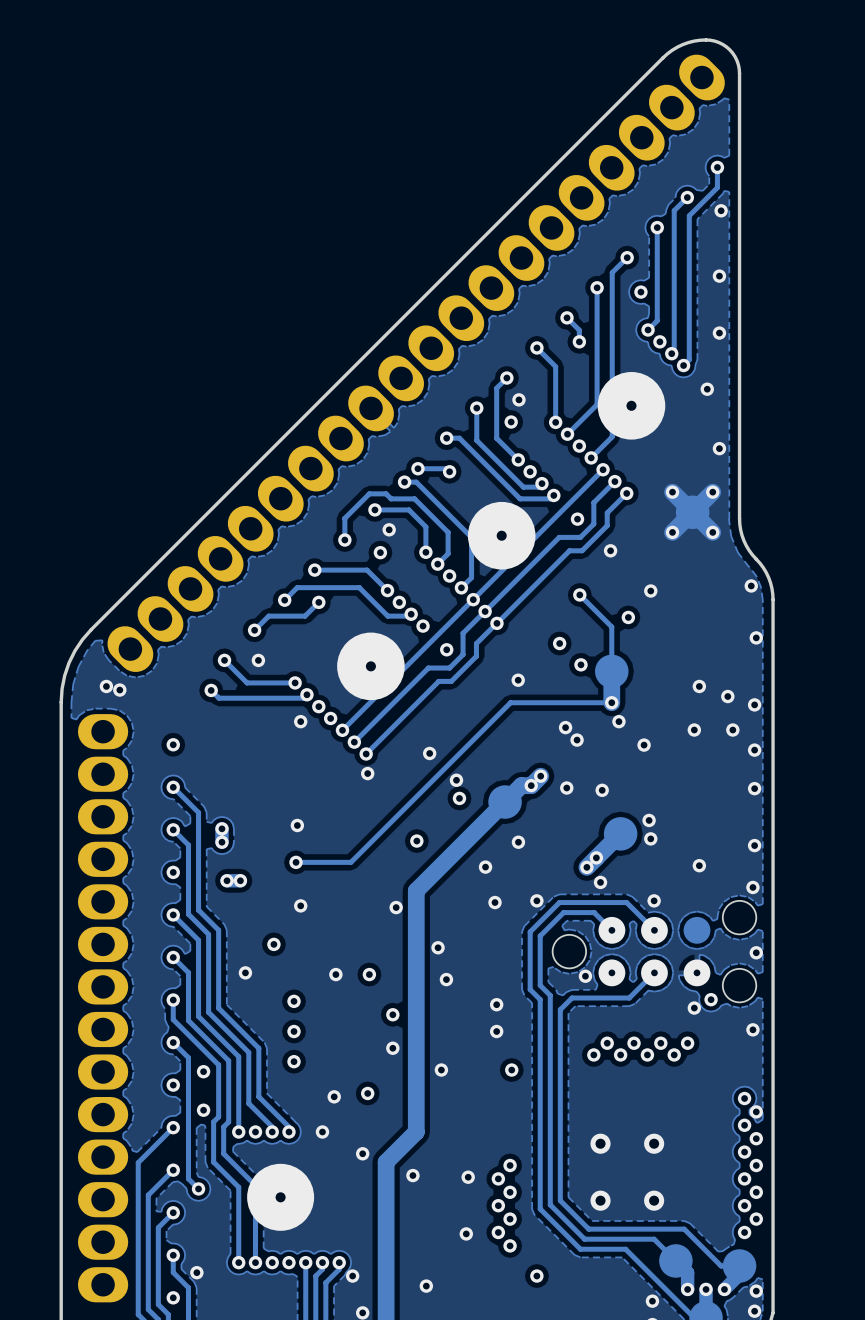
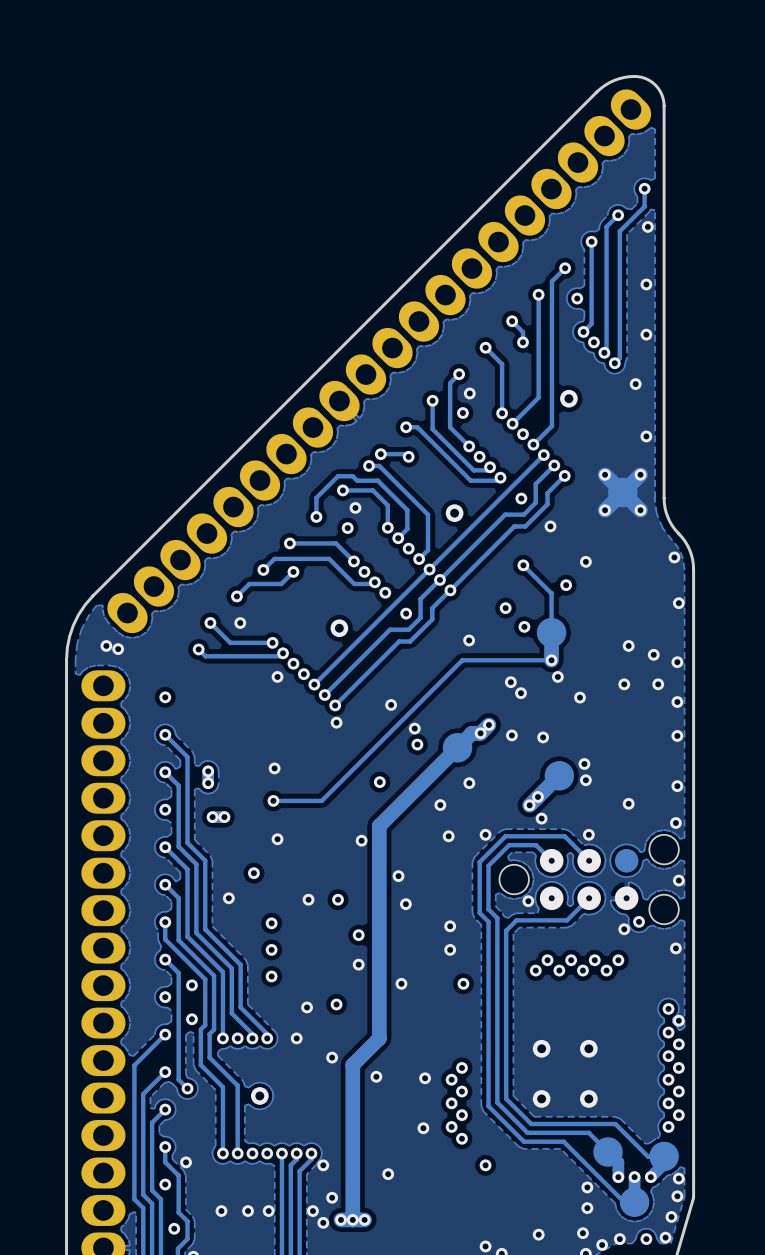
via size: [597, 372, 666, 440] -> [560, 389, 578, 408]
via size: [467, 501, 536, 570] -> [445, 504, 464, 523]
via size: [337, 632, 405, 701] -> [330, 619, 349, 638]
via size: [247, 1163, 315, 1231] -> [250, 1087, 269, 1105]

